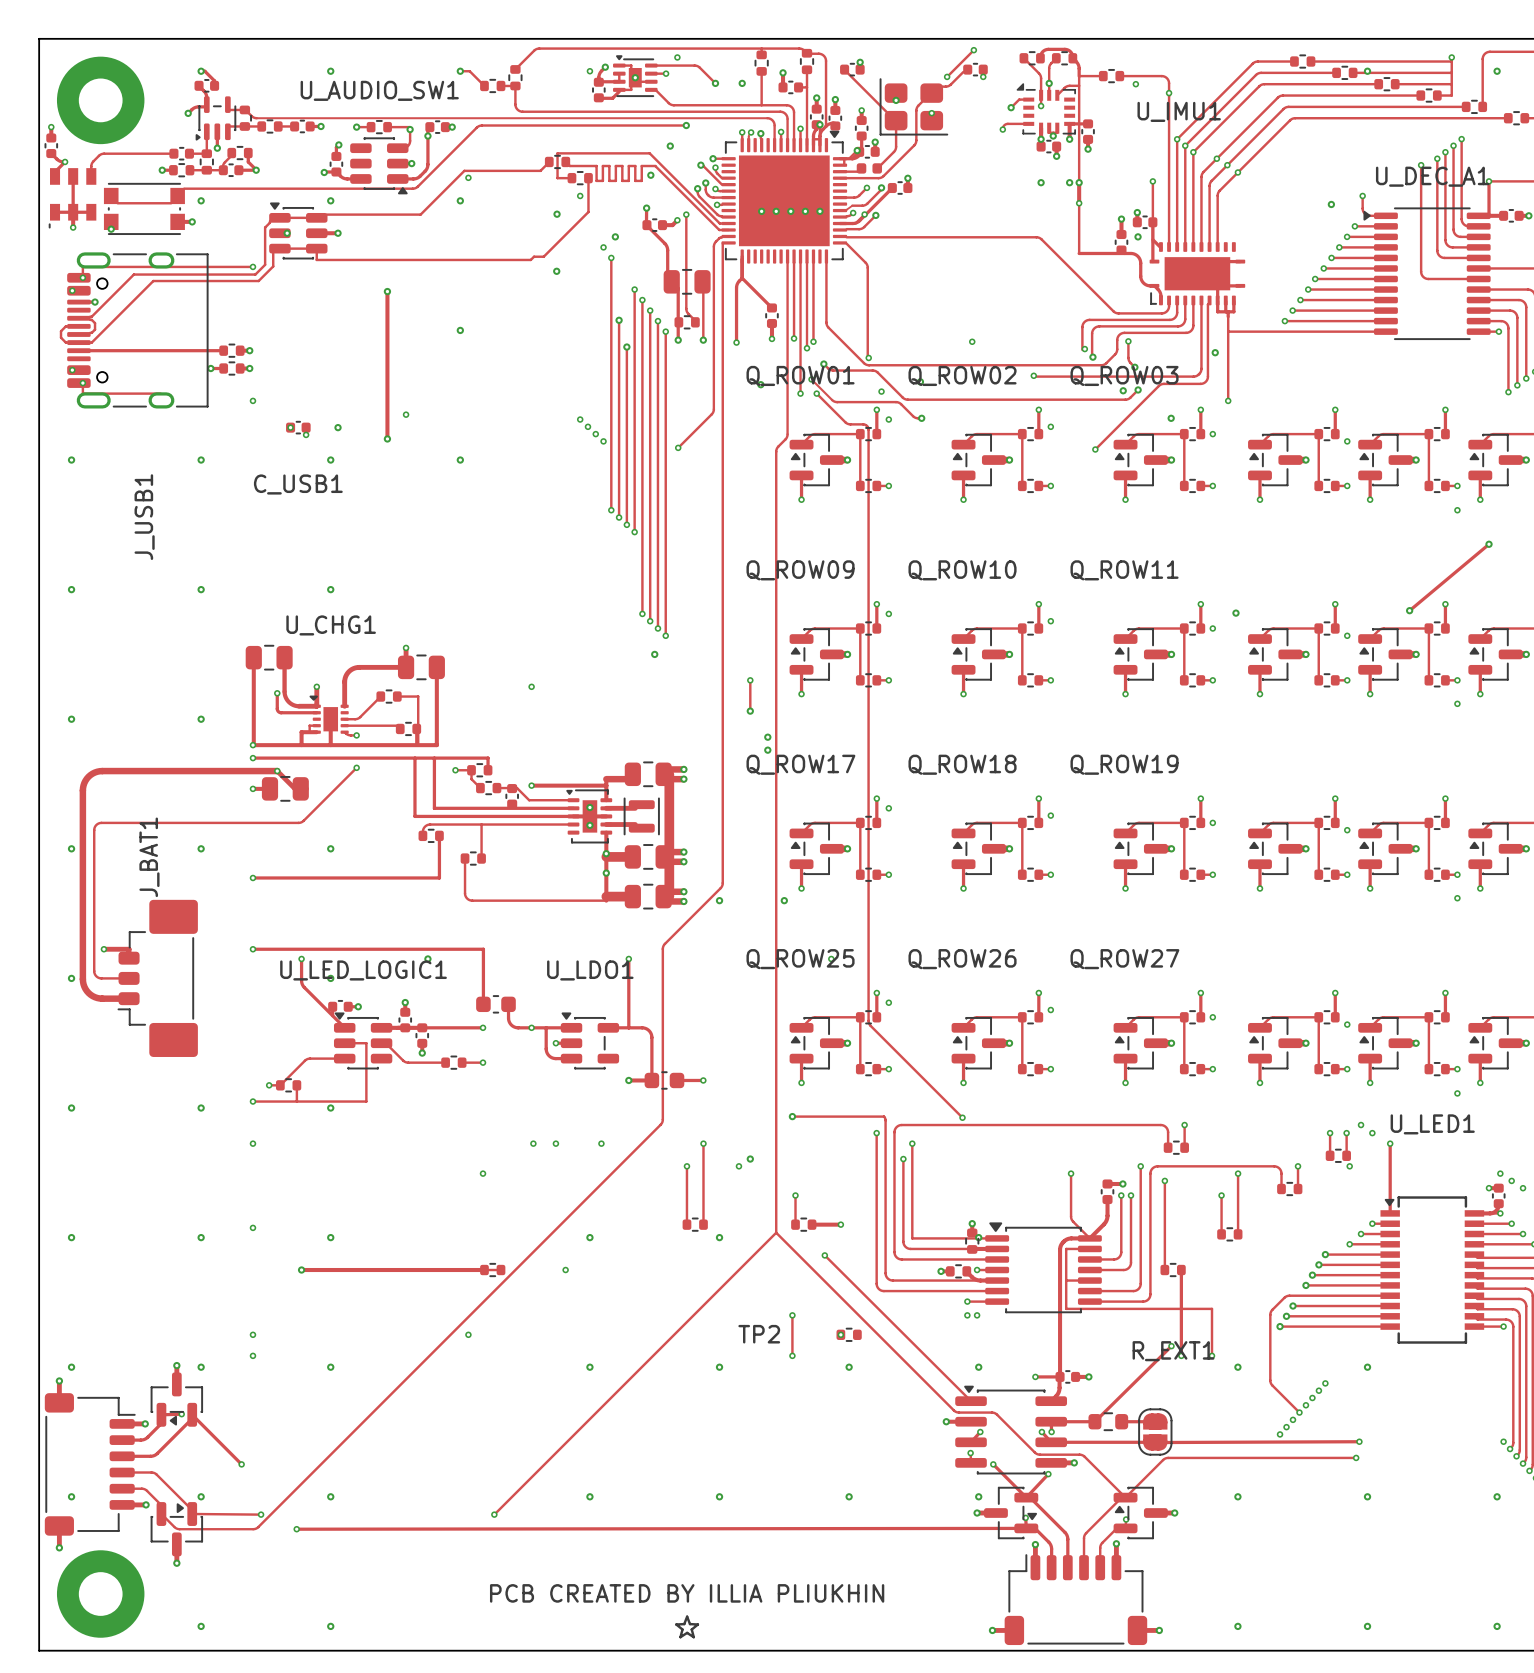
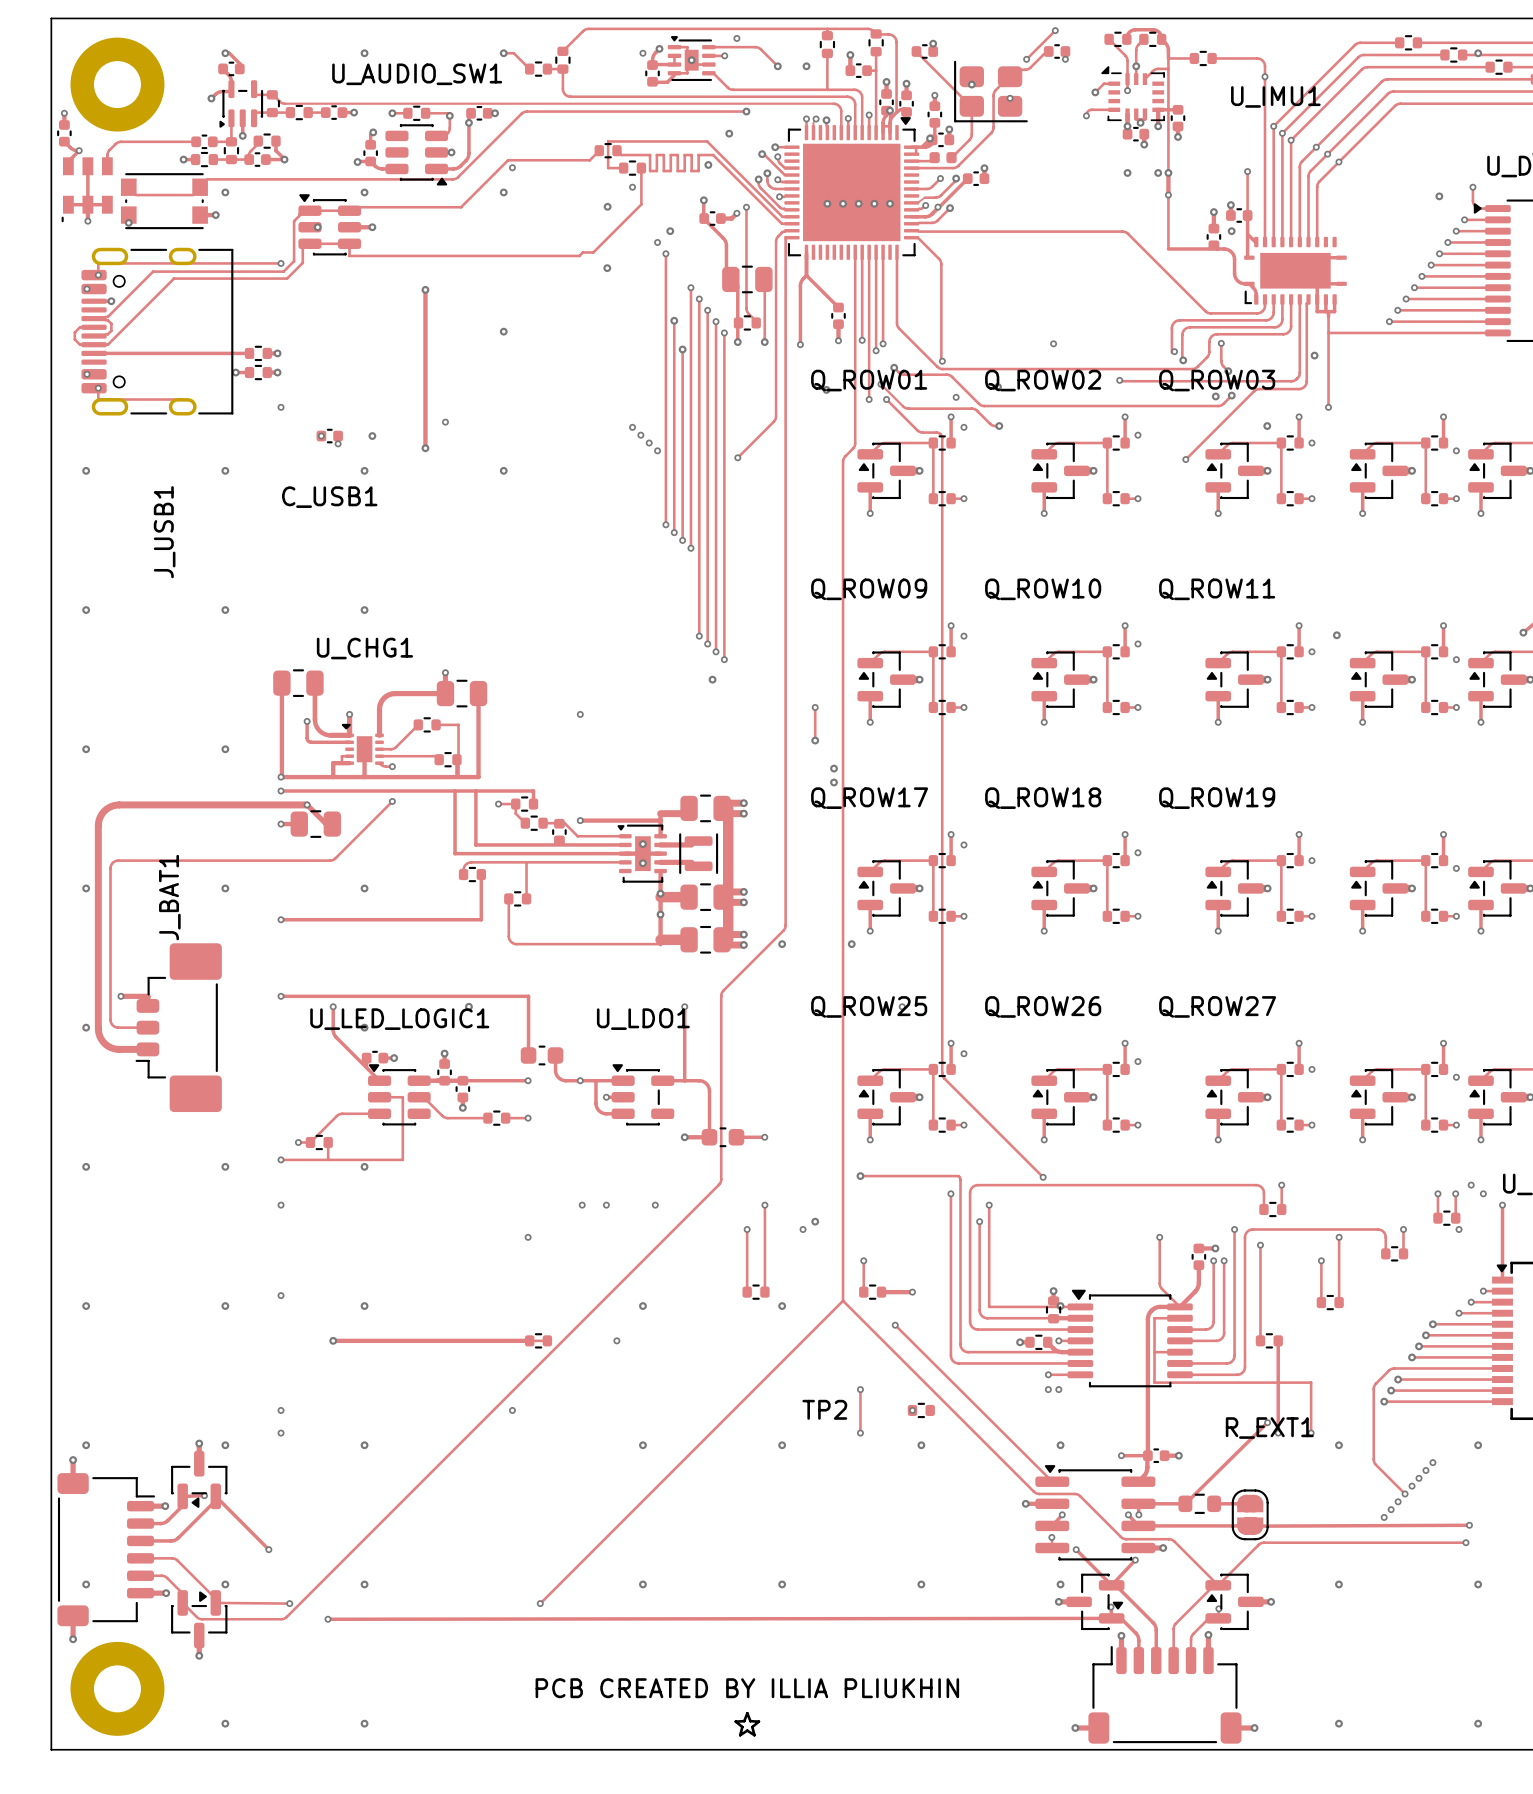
via: (1135, 84) -> none

